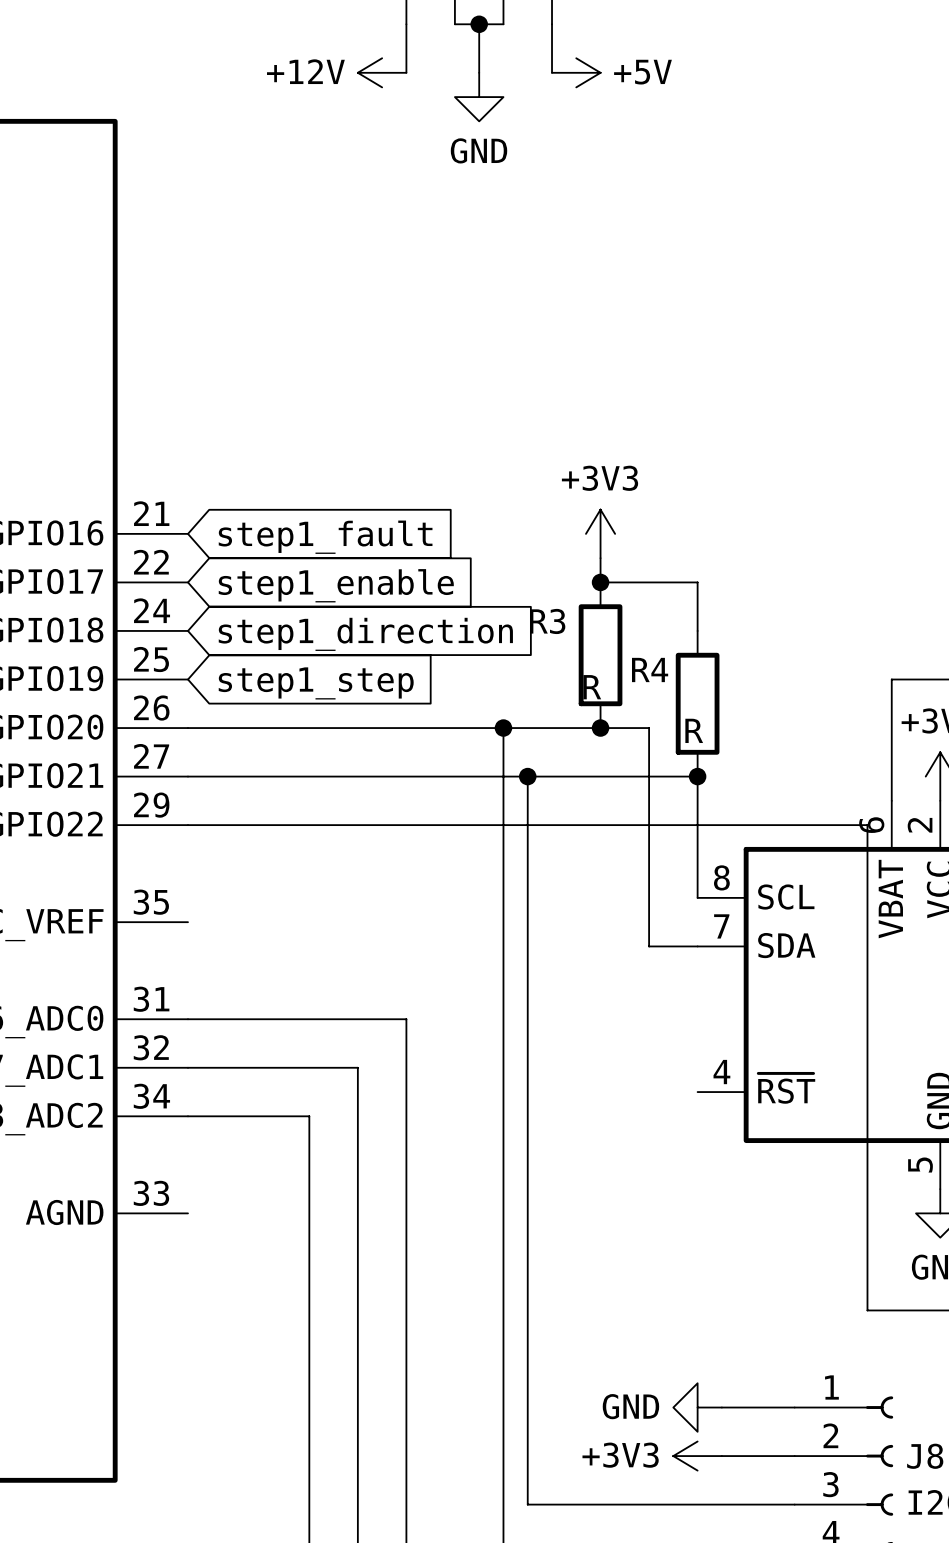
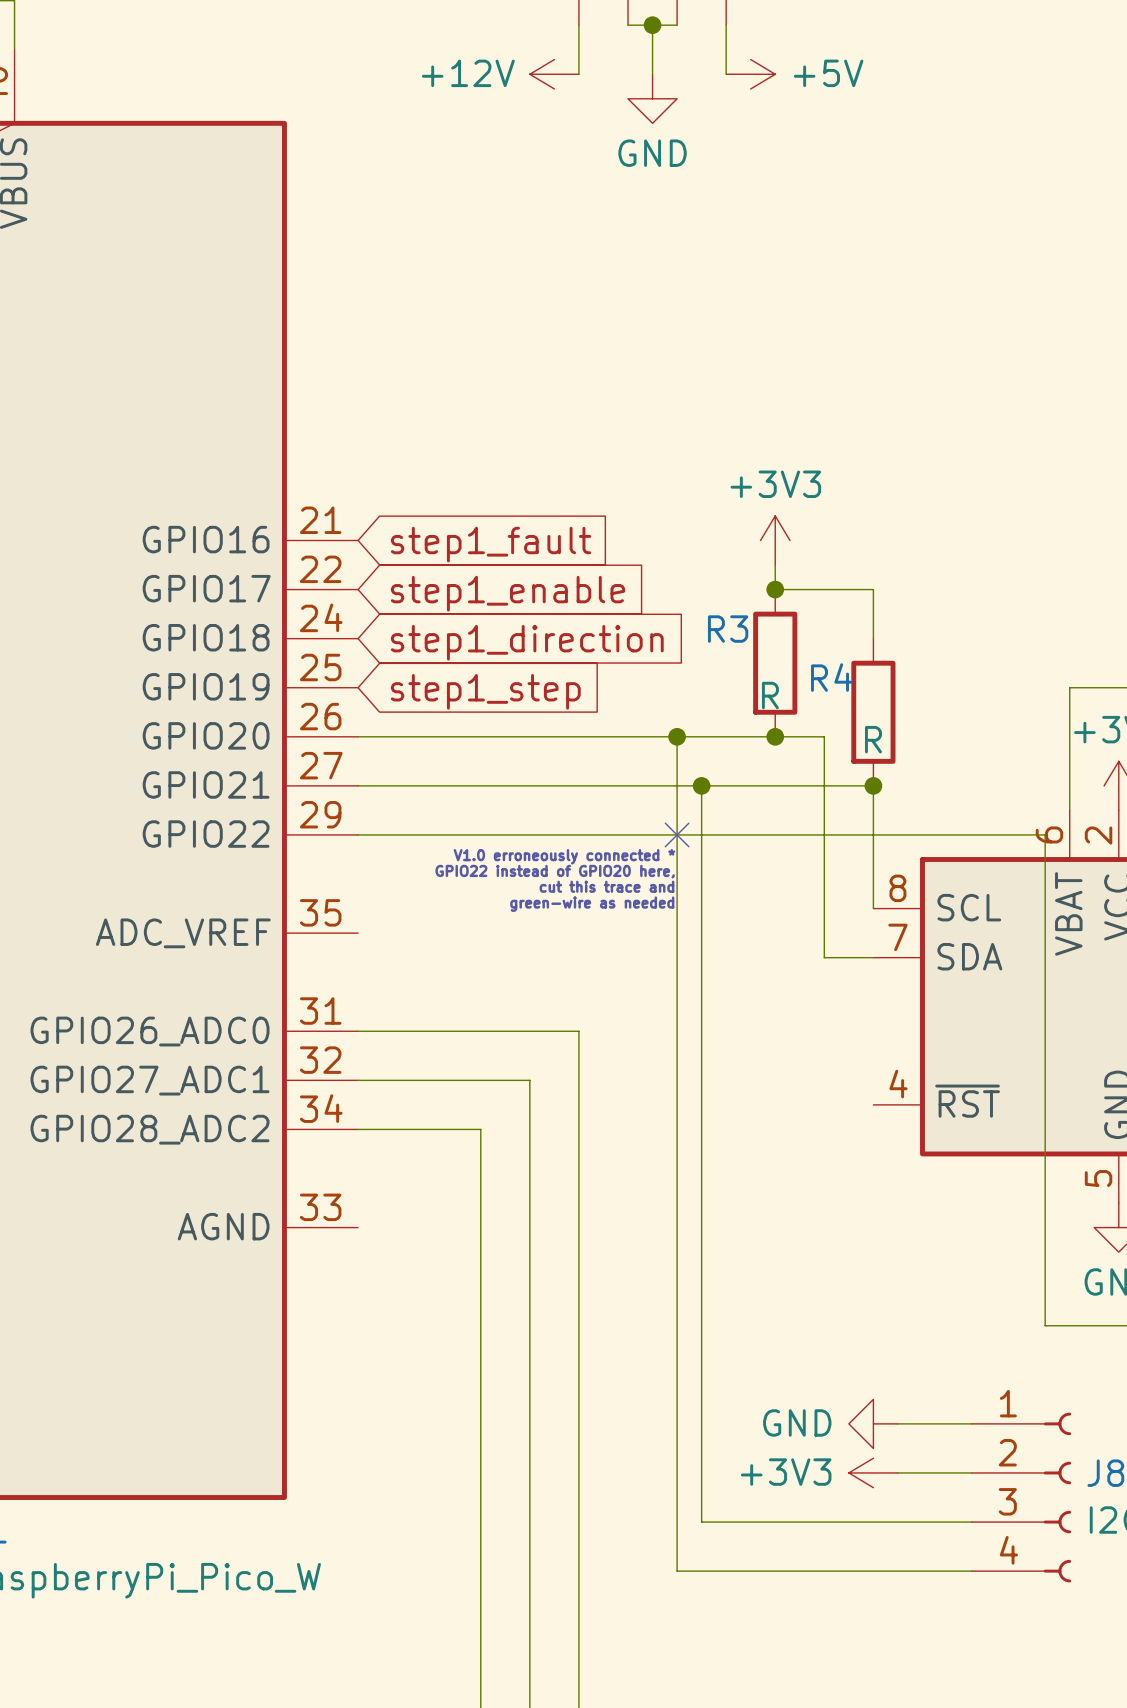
no-connect mark: none -> (677, 834)
text: none -> V1.0 erroneously connected * (564, 856)
text: none -> GPIO22 instead of GPIO20 here, (555, 871)
text: none -> cut this trace and (607, 886)
text: none -> green-wire as needed (592, 904)

